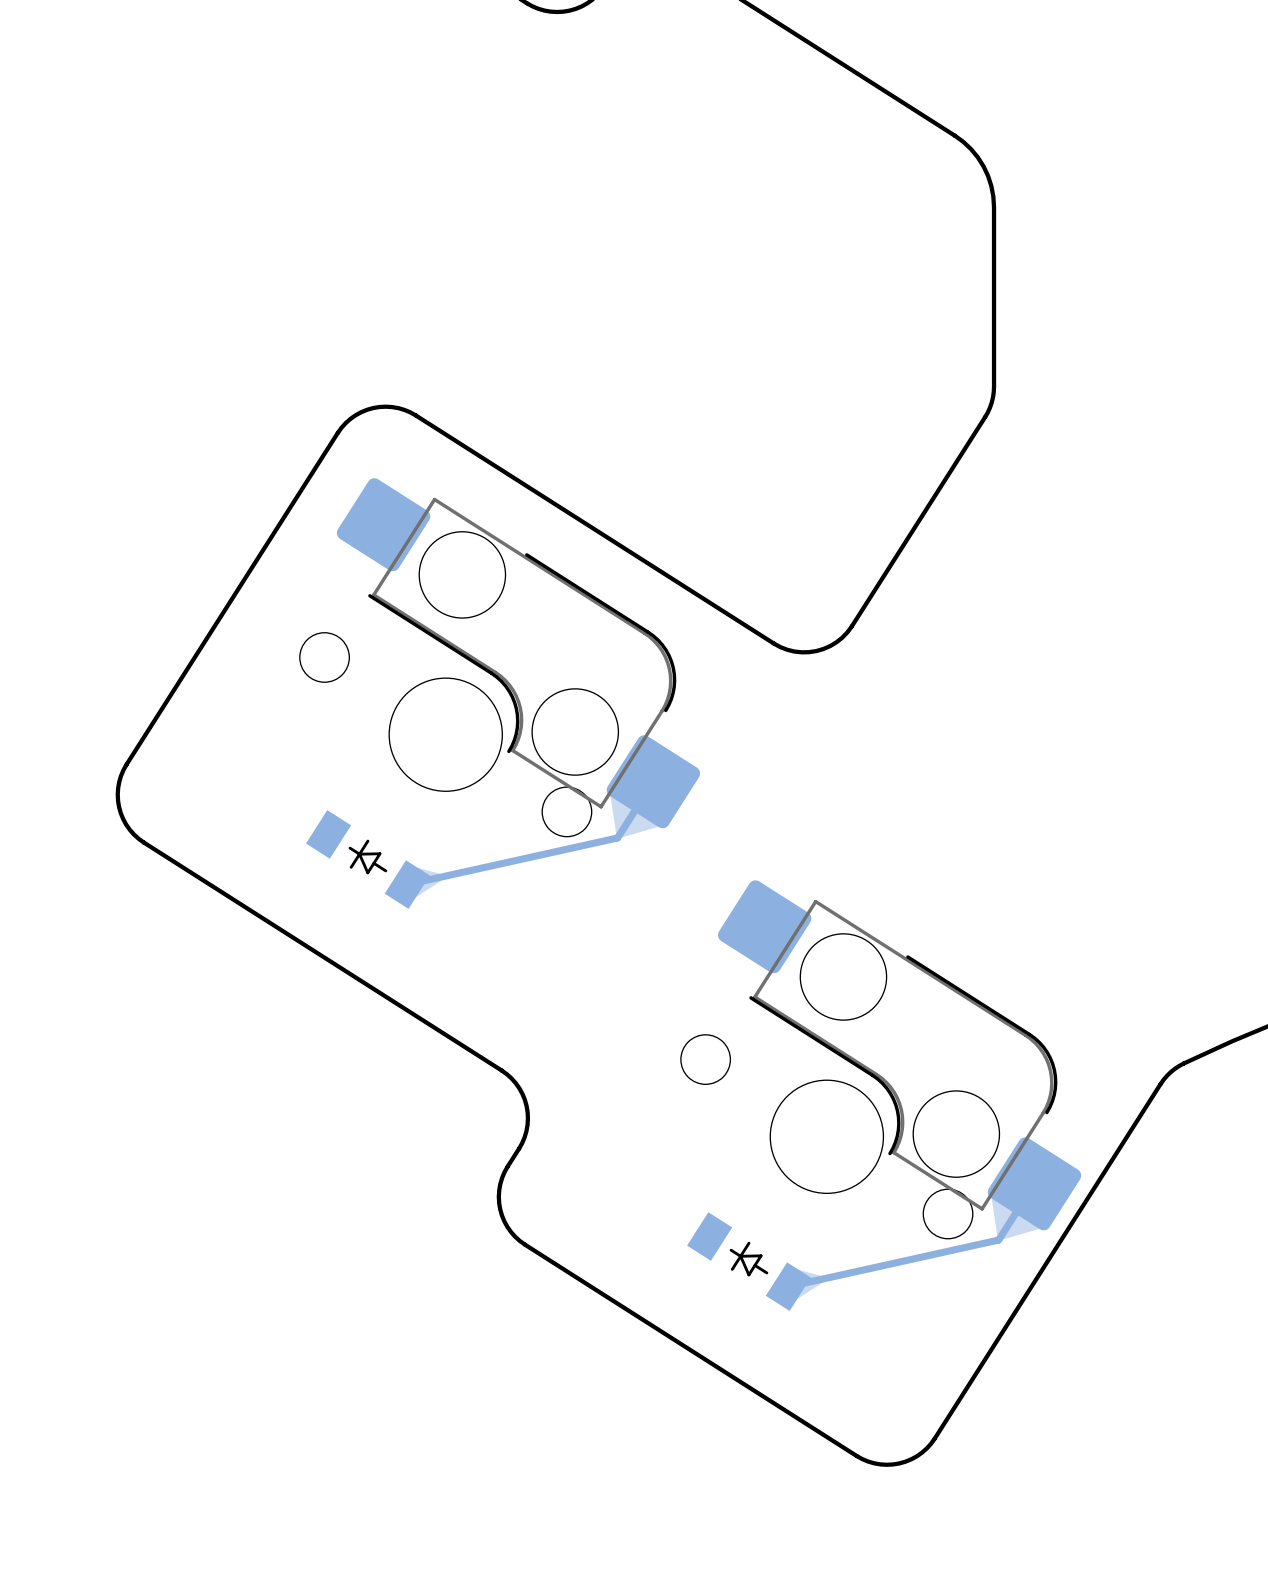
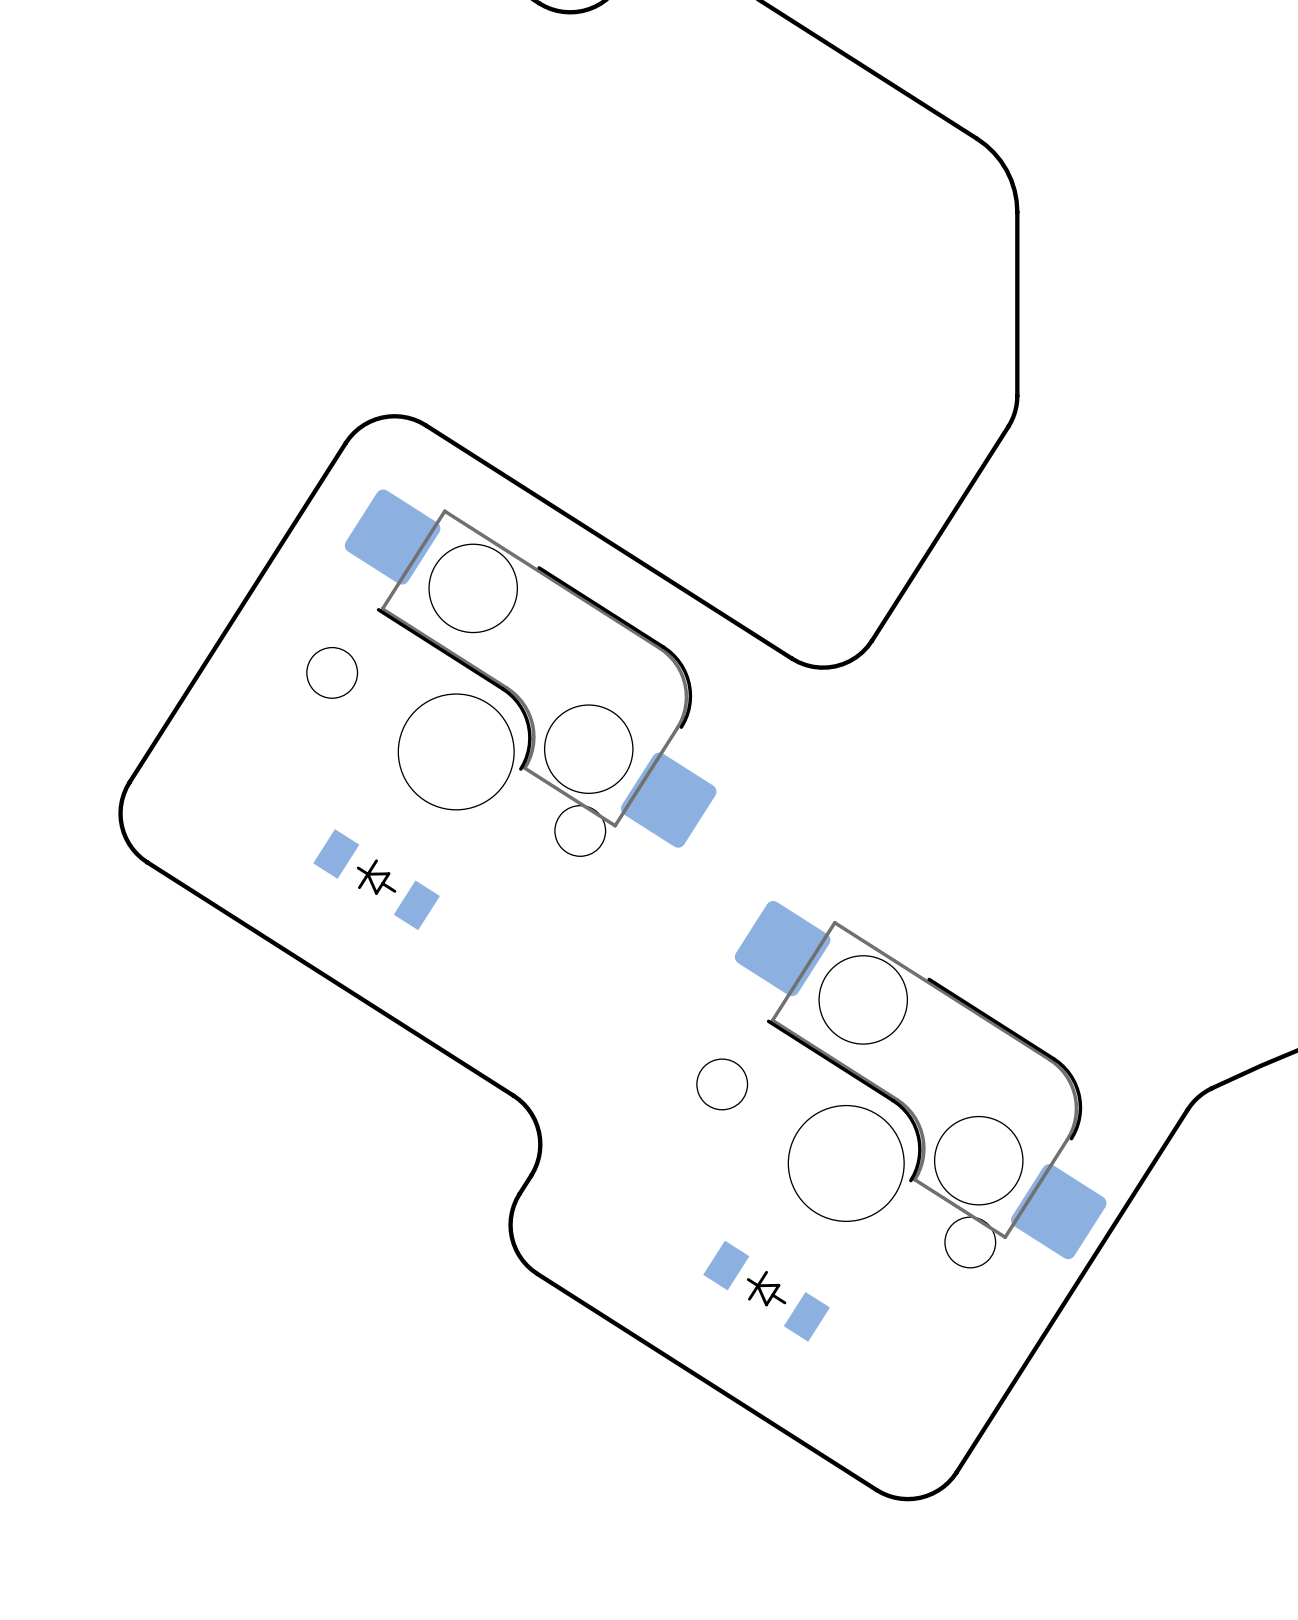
bottom track: (653, 781) (617, 837) (407, 884) -> none
bottom track: (1034, 1183) (998, 1240) (788, 1286) -> none

